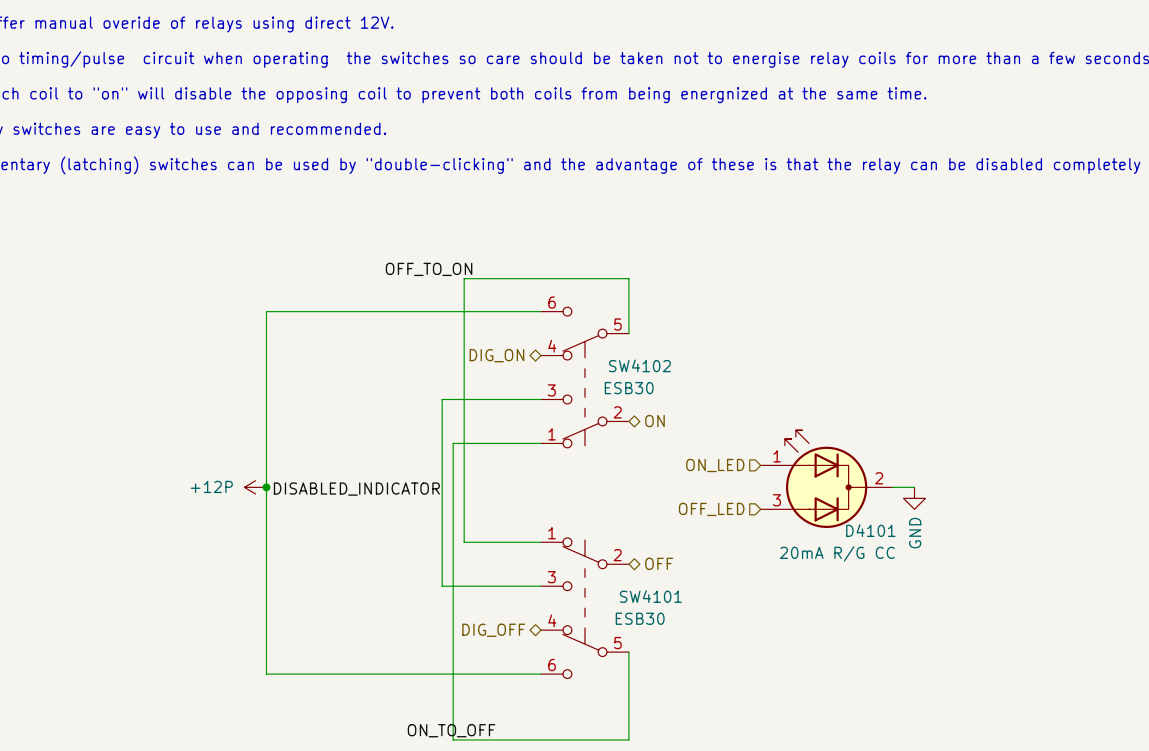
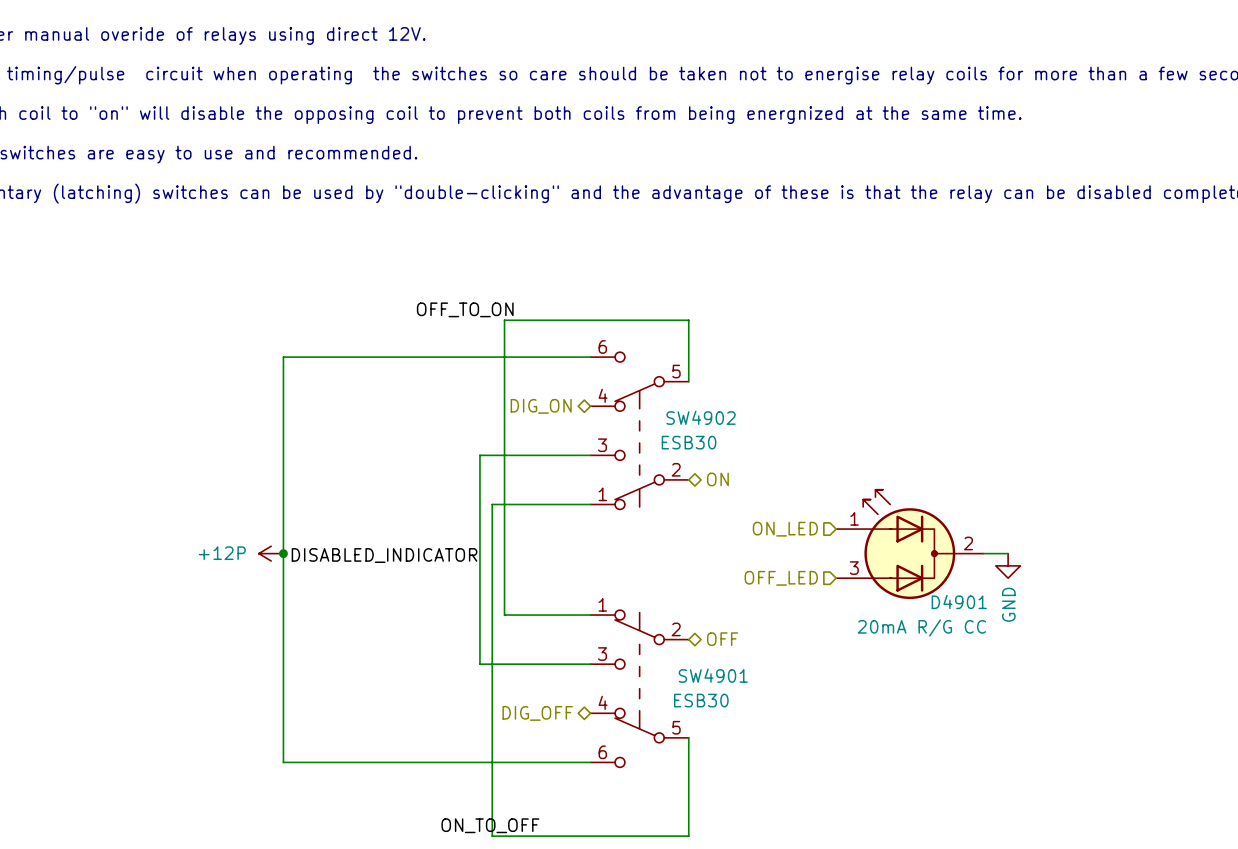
SW4102 name: SW4102 (639, 365) -> SW4902 (701, 417)
D4101 name: D4101 (870, 530) -> D4901 (959, 602)
SW4101 name: SW4101 (650, 596) -> SW4901 (713, 675)

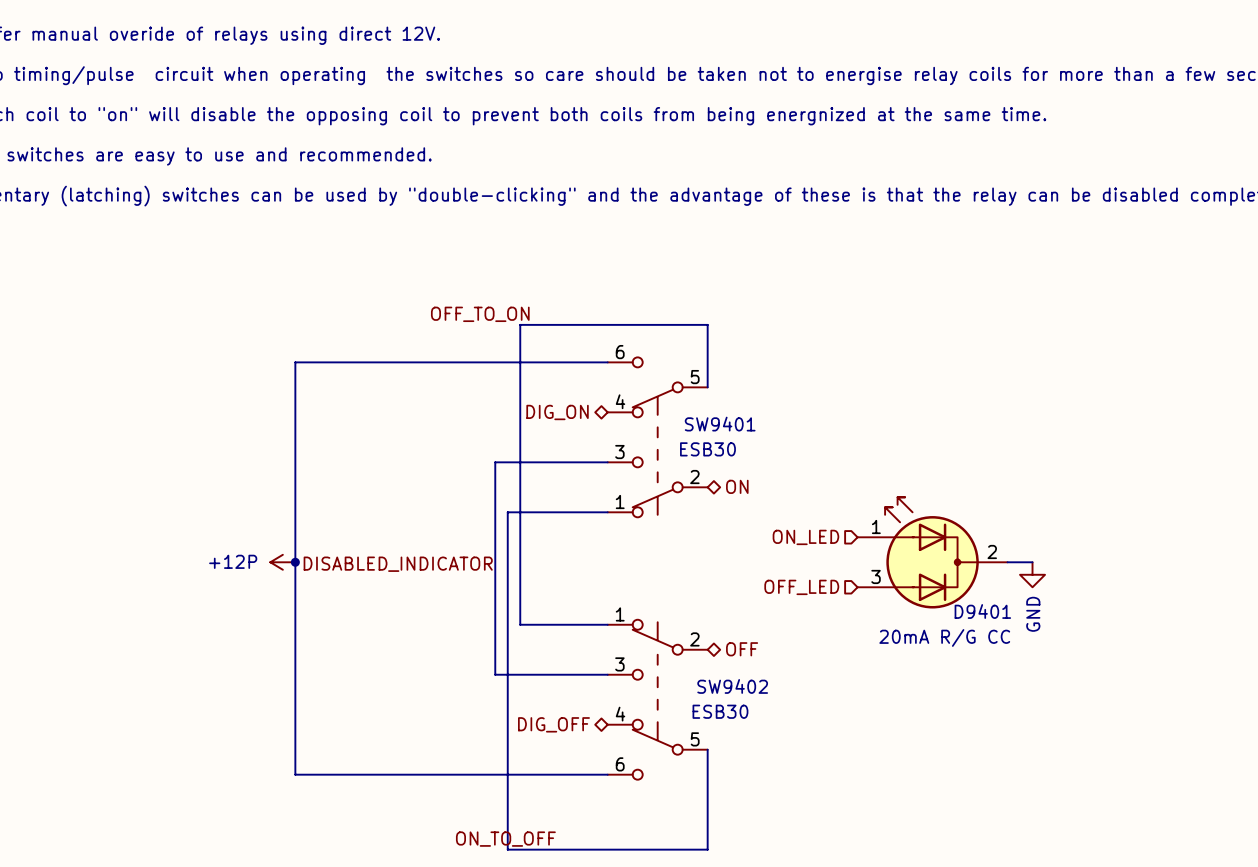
SW4902 name: SW4902 (701, 417) -> SW9401 (720, 424)
D4901 name: D4901 (959, 602) -> D9401 (982, 611)
SW4901 name: SW4901 (713, 675) -> SW9402 (732, 686)

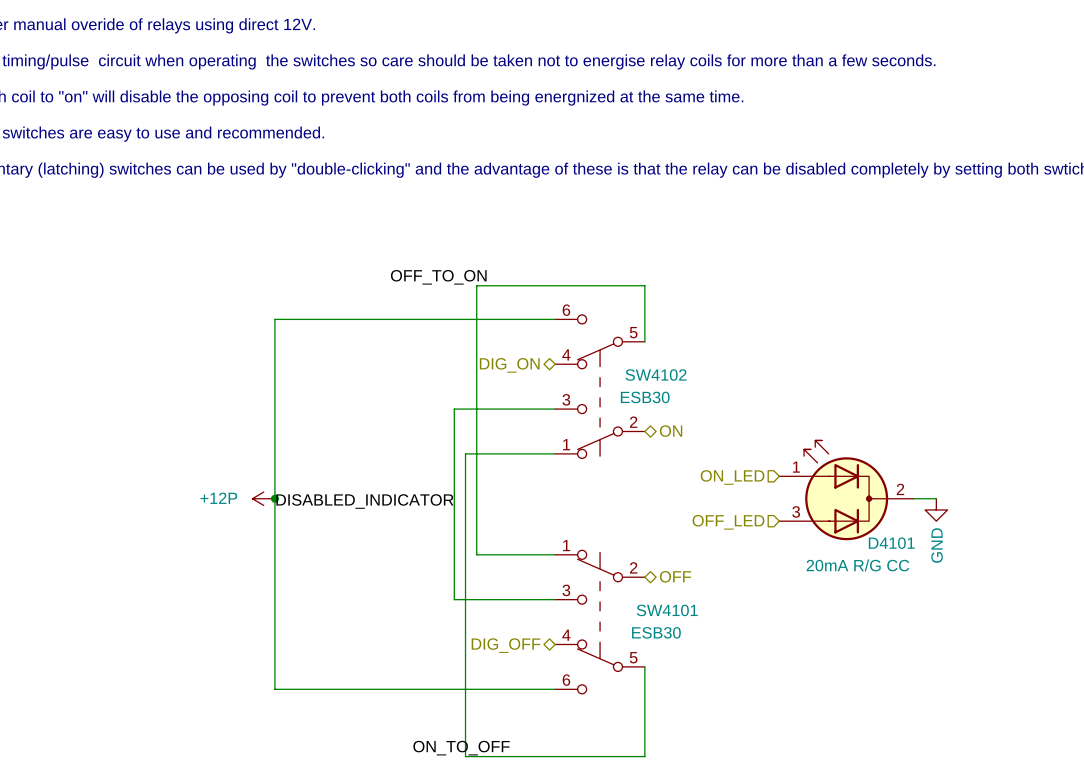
SW9401 name: SW9401 (720, 424) -> SW4102 (656, 375)
D9401 name: D9401 (982, 611) -> D4101 (891, 543)
SW9402 name: SW9402 (732, 686) -> SW4101 (667, 610)

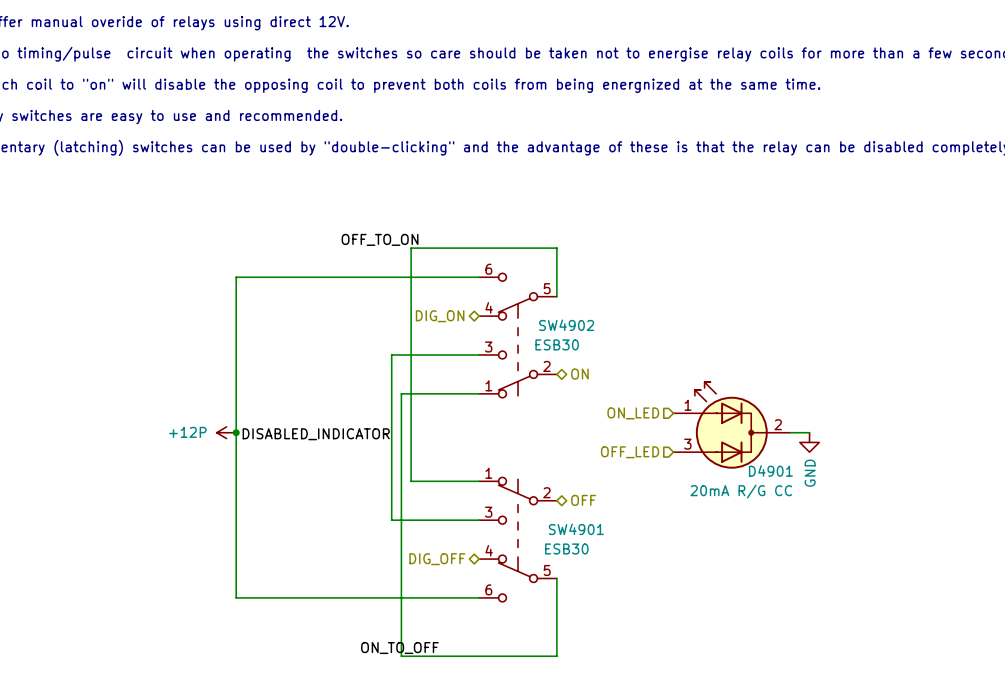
SW4102 name: SW4102 (656, 375) -> SW4902 (566, 325)
D4101 name: D4101 (891, 543) -> D4901 (770, 471)
SW4101 name: SW4101 (667, 610) -> SW4901 (576, 529)

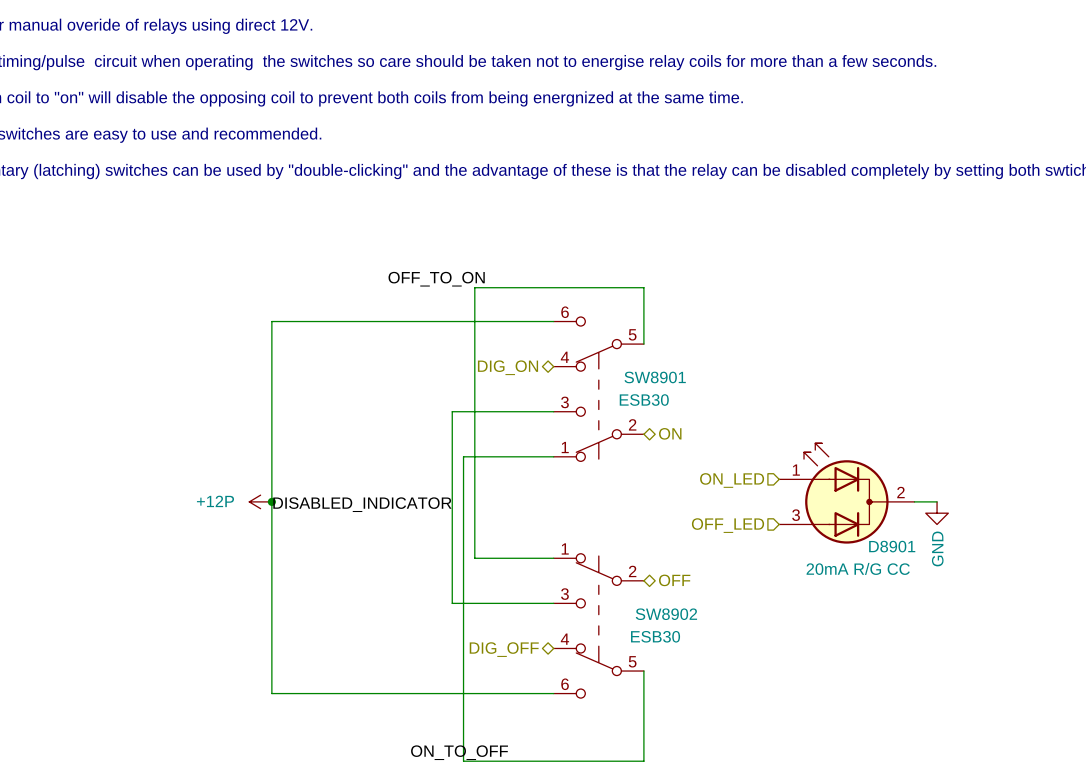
SW4902 name: SW4902 (566, 325) -> SW8901 (655, 377)
D4901 name: D4901 (770, 471) -> D8901 (892, 546)
SW4901 name: SW4901 (576, 529) -> SW8902 (666, 614)

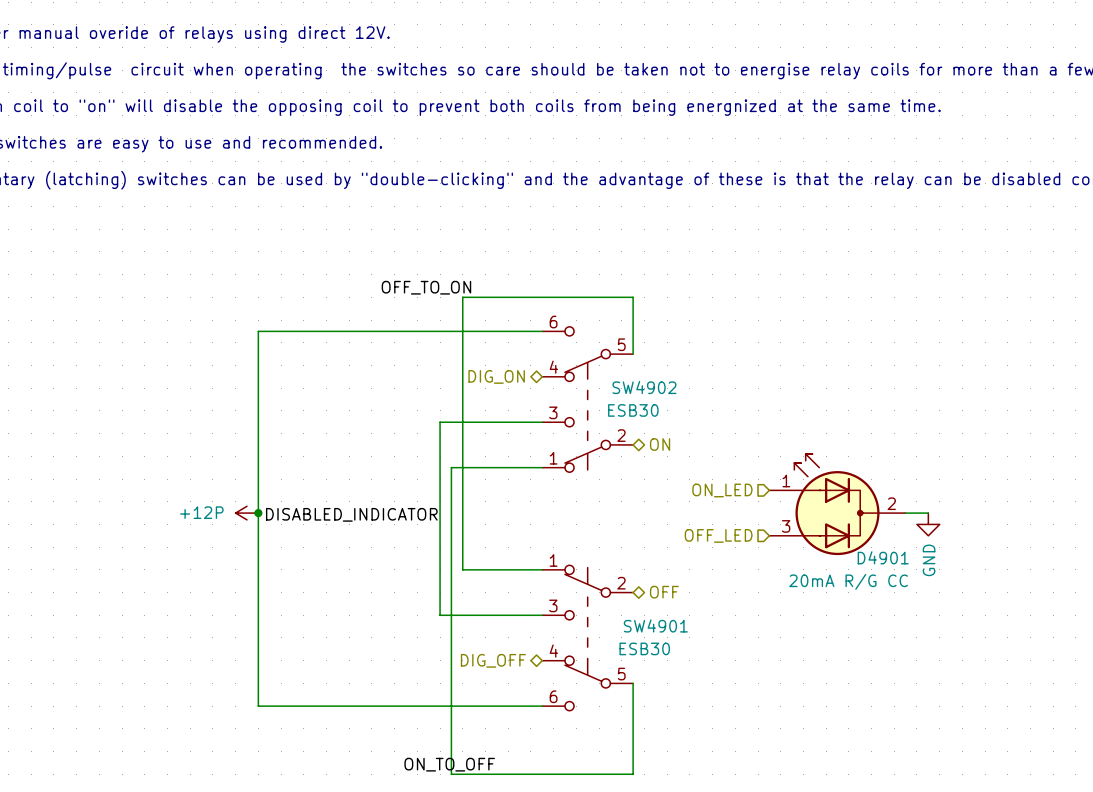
SW8901 name: SW8901 (655, 377) -> SW4902 (644, 387)
D8901 name: D8901 (892, 546) -> D4901 (883, 557)
SW8902 name: SW8902 (666, 614) -> SW4901 (655, 625)

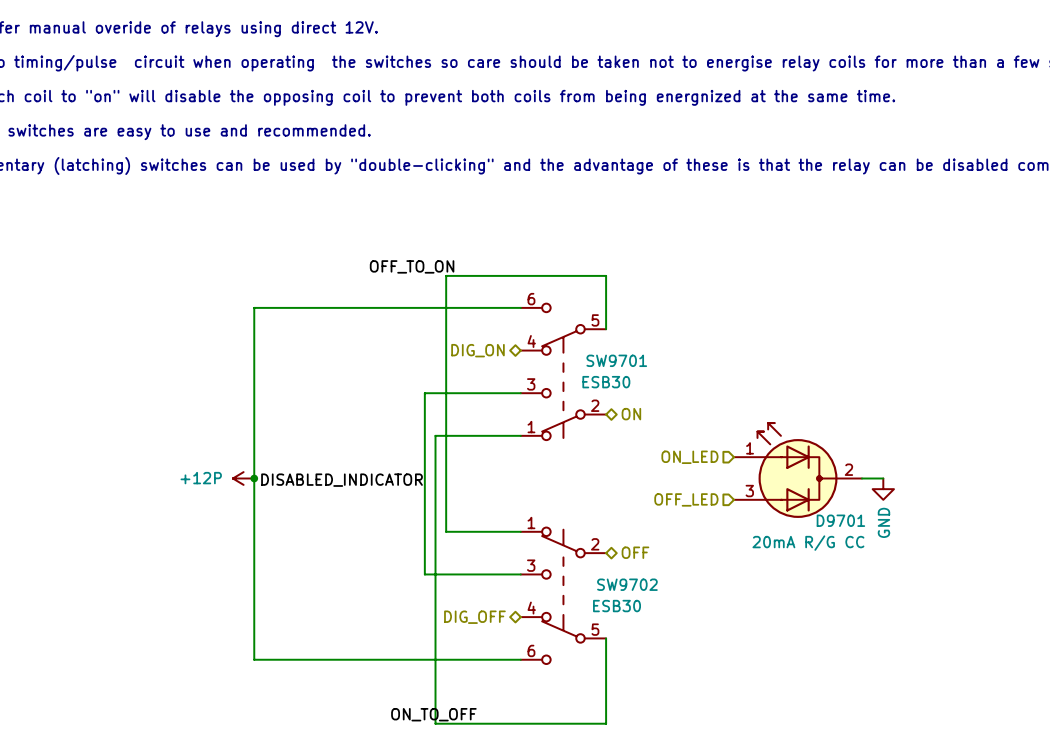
SW4902 name: SW4902 (644, 387) -> SW9701 (616, 360)
D4901 name: D4901 (883, 557) -> D9701 (840, 520)
SW4901 name: SW4901 (655, 625) -> SW9702 (627, 584)

